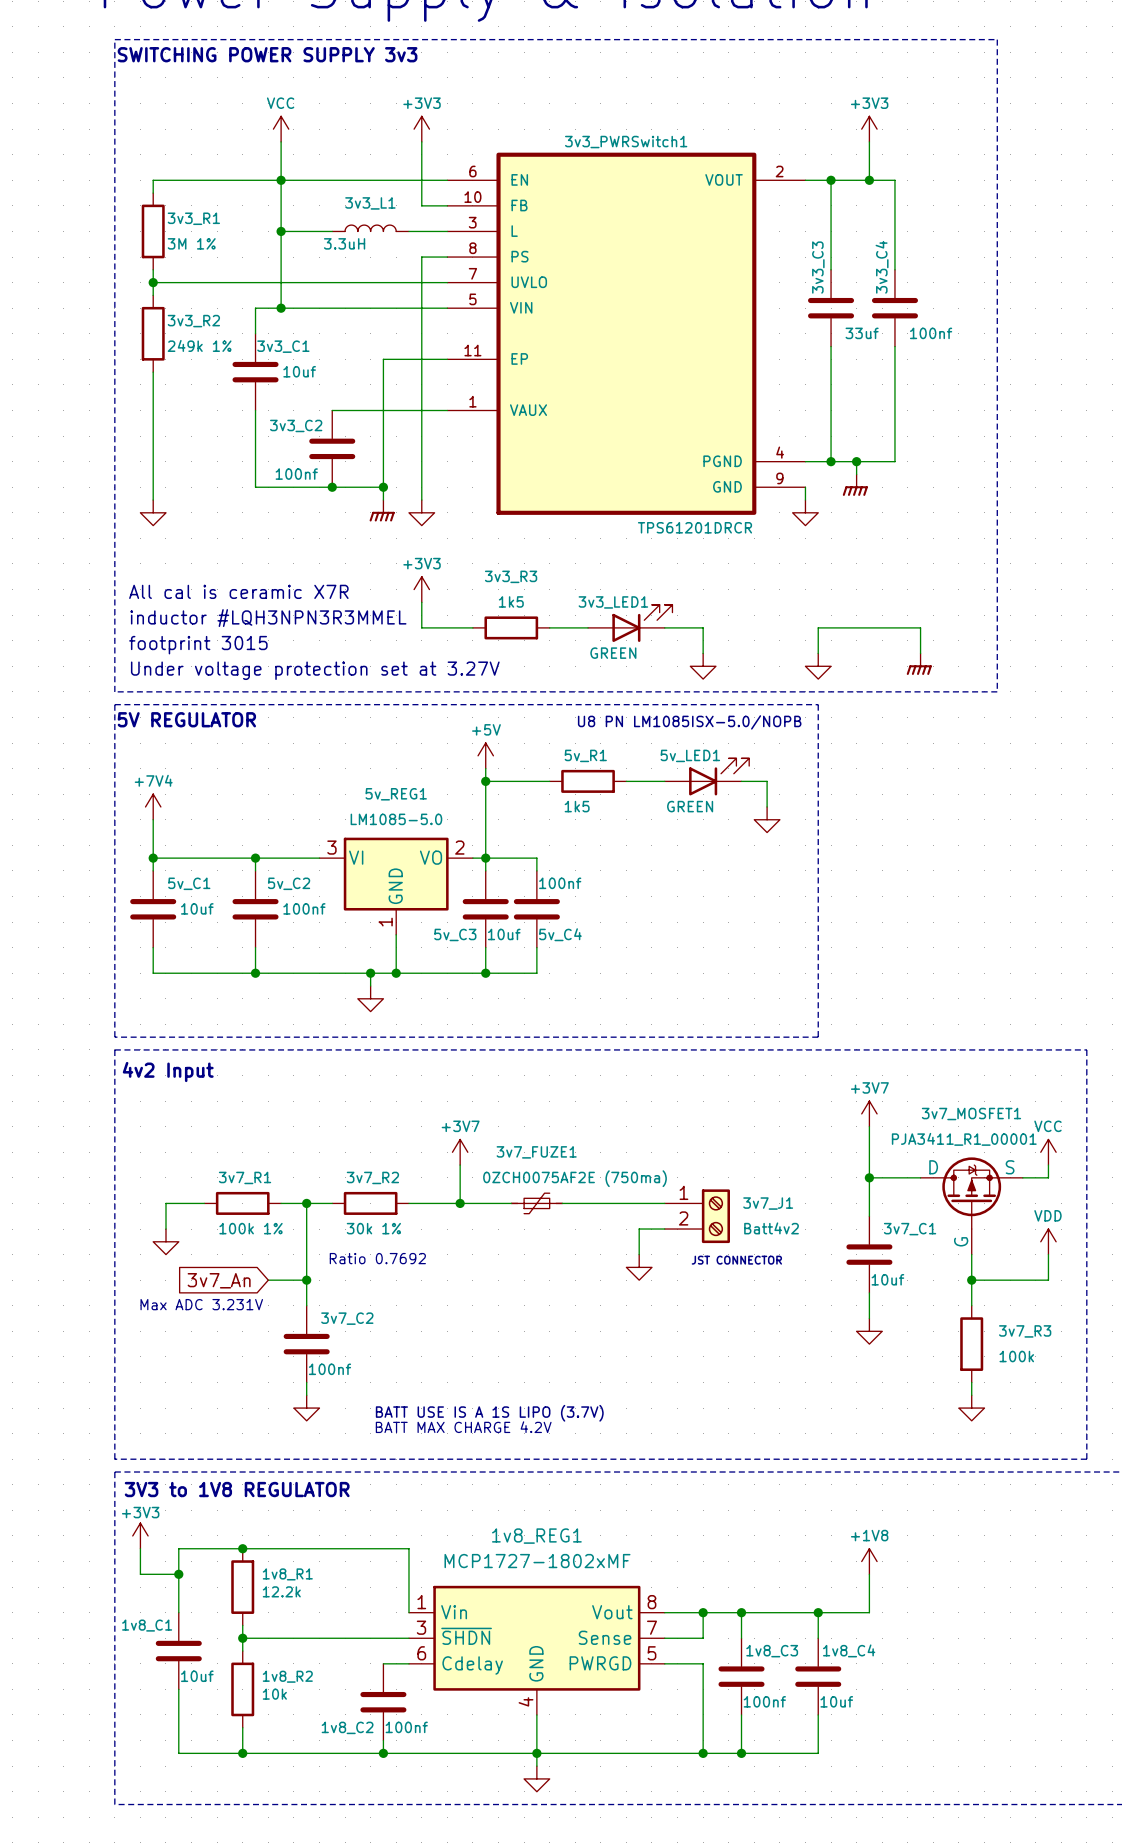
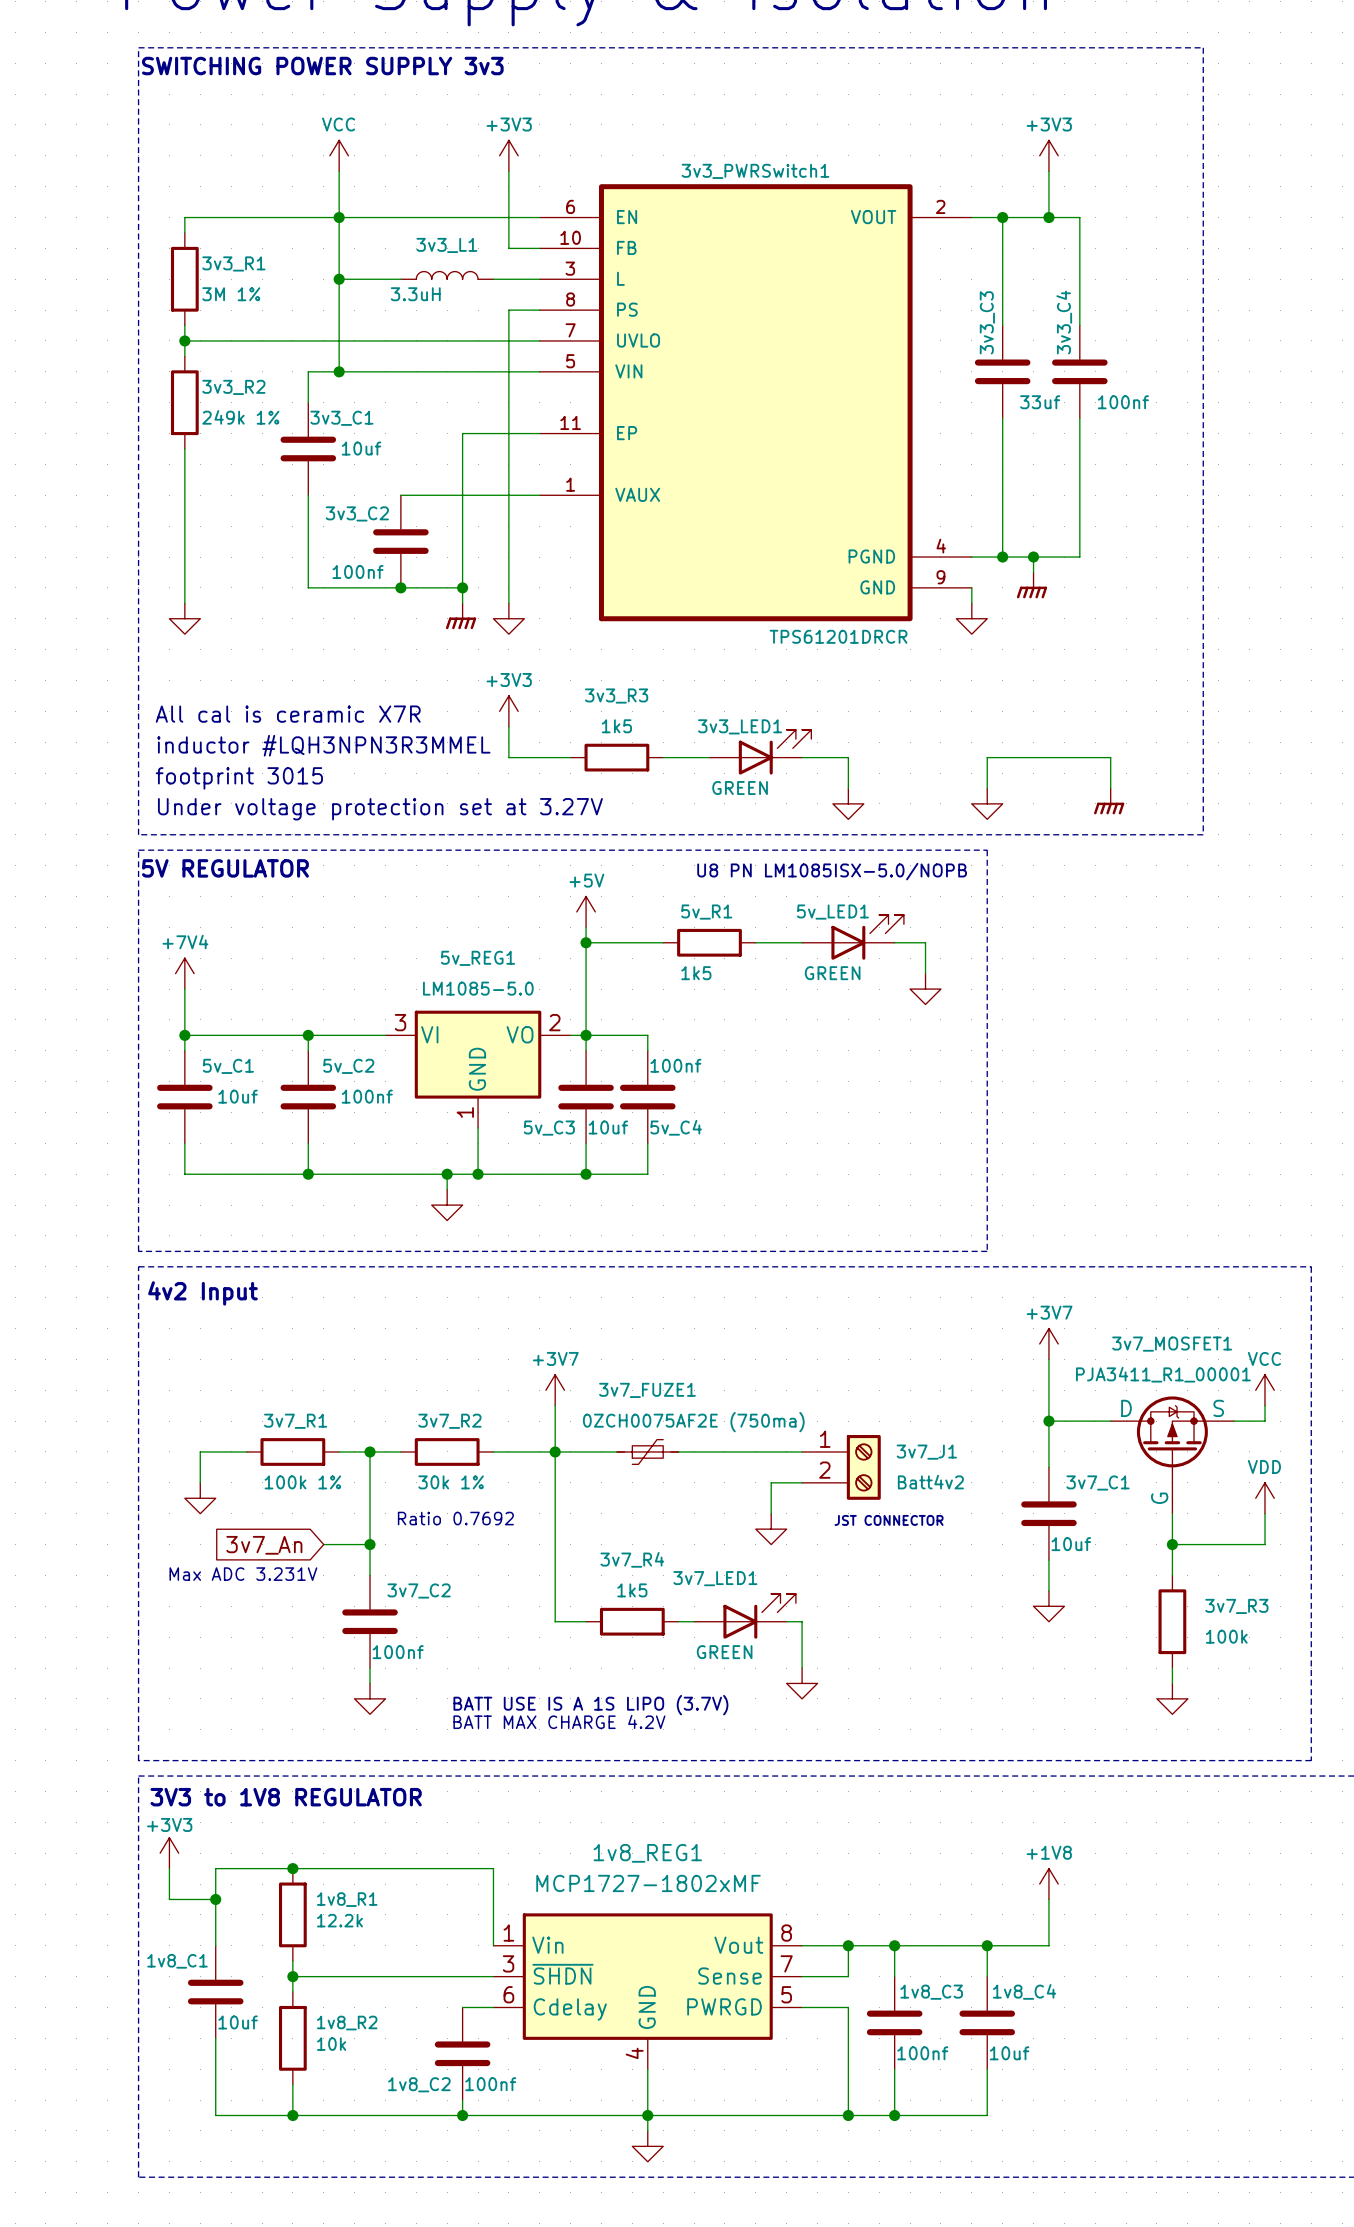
wire: none -> (555, 1451) (555, 1621) (586, 1621)
3v7_LED1: none -> GREEN (744, 1616)
3v7_R4: none -> 1k5 (632, 1621)
wire: none -> (678, 1621) (694, 1621)
wire: none -> (786, 1621) (802, 1621) (802, 1668)
power symbol: none -> (802, 1683)

